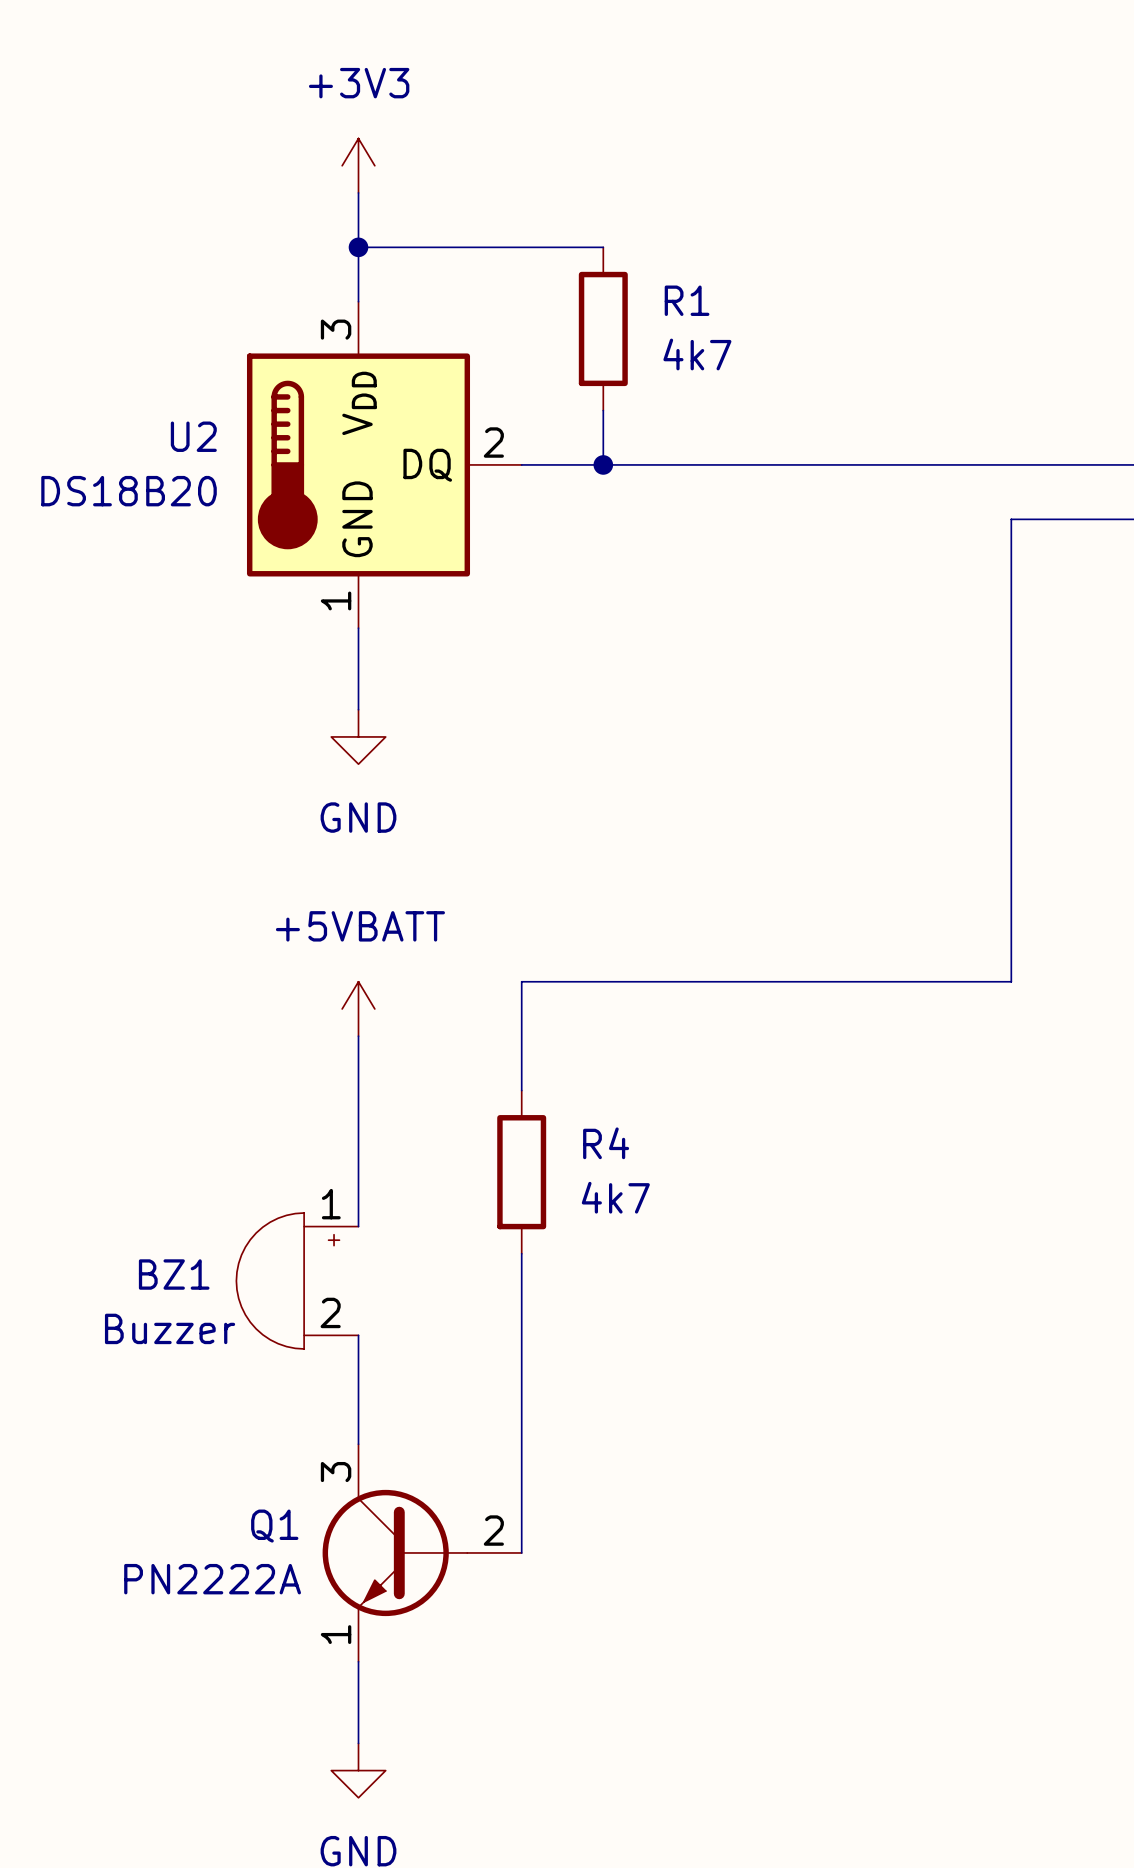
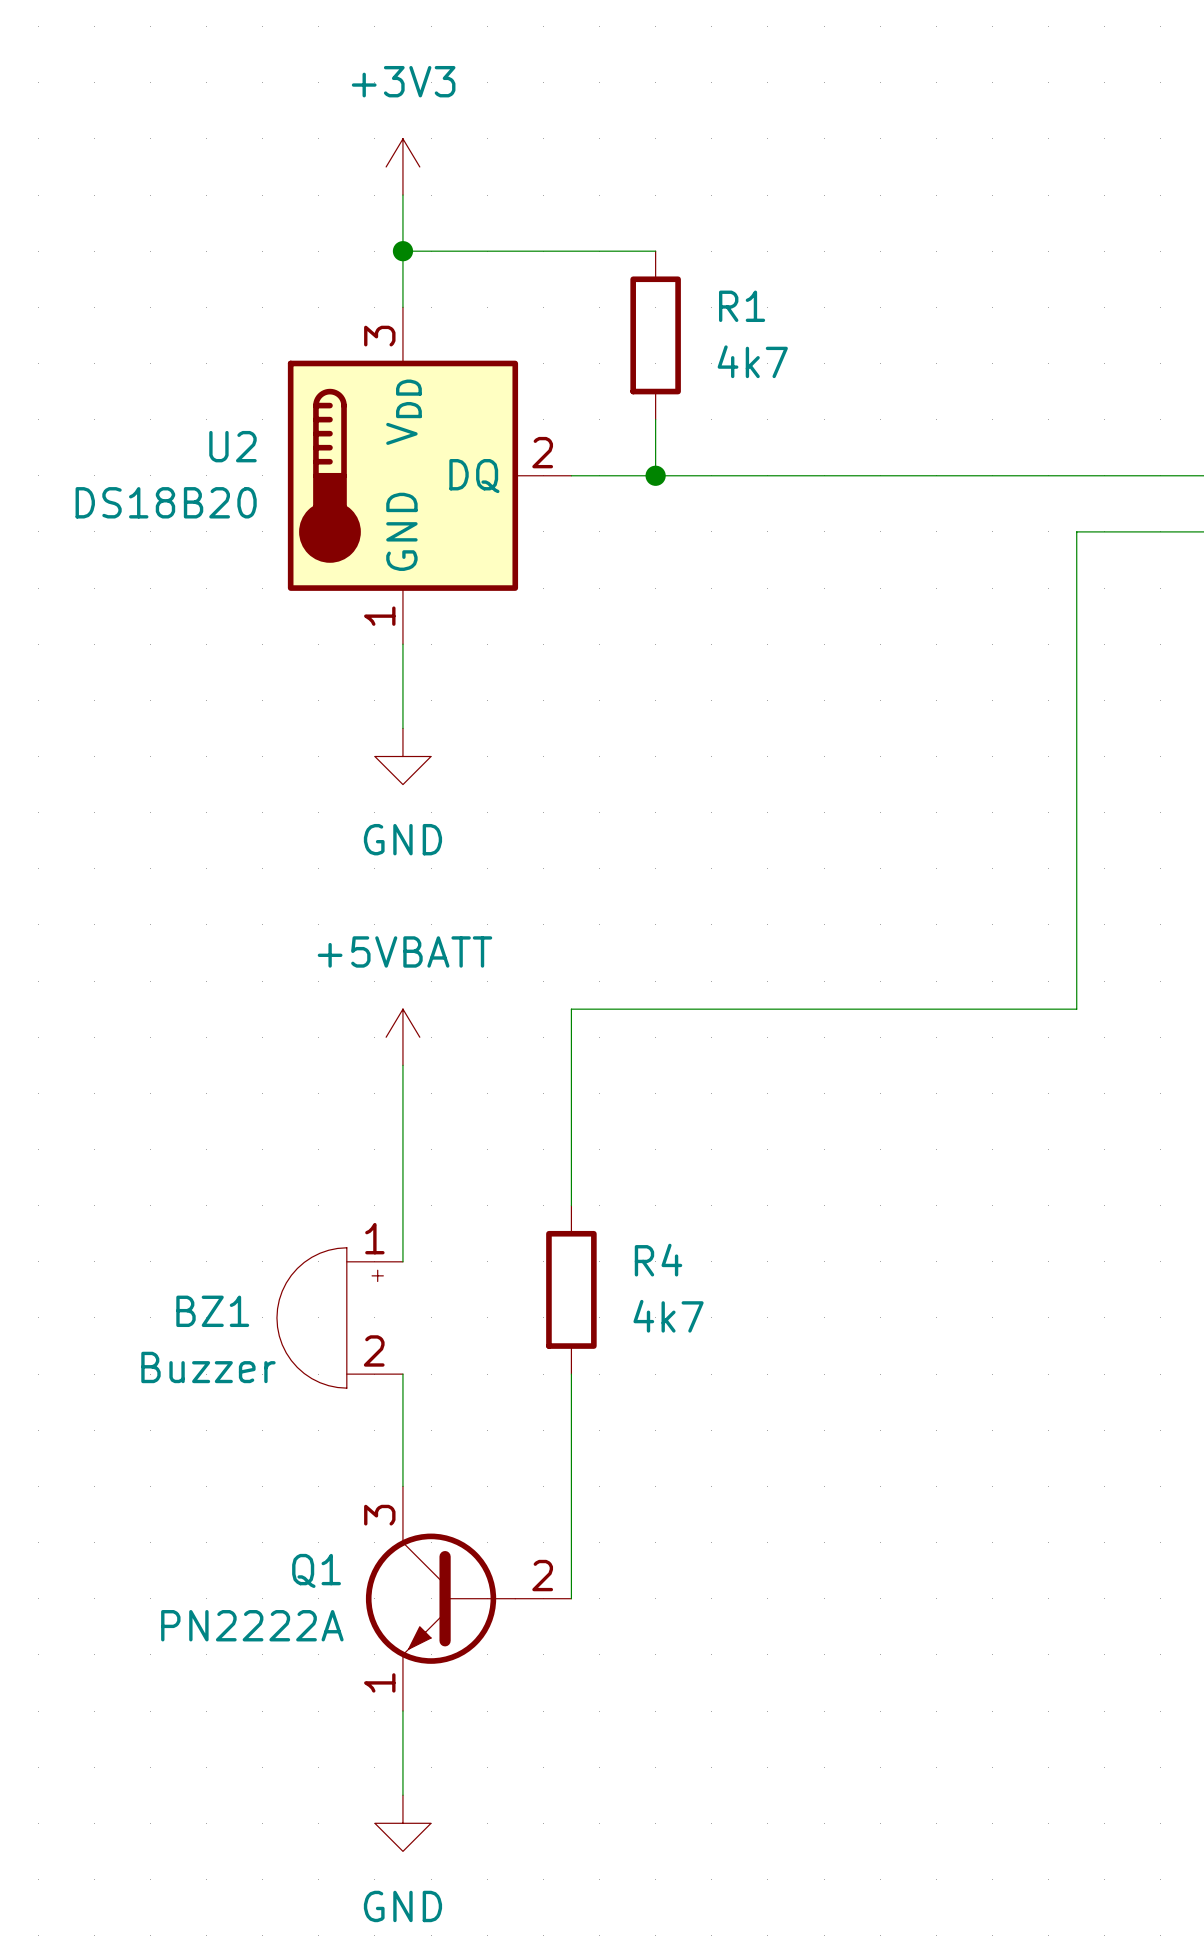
R4 position: (521, 1172) -> (571, 1289)
wire: (521, 1253) (521, 1335) -> (571, 1121) (571, 1205)

